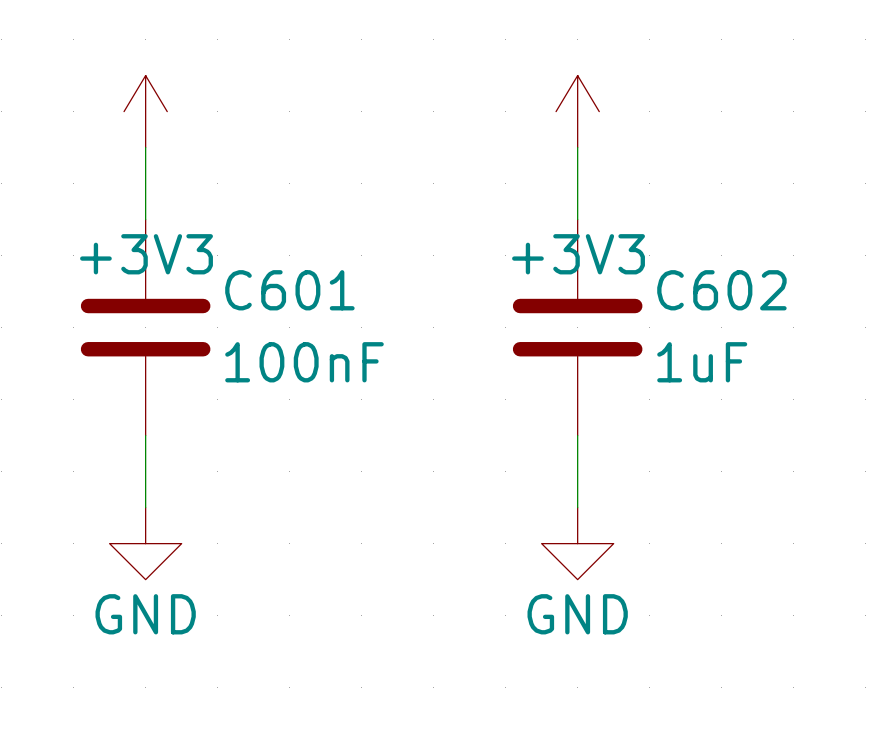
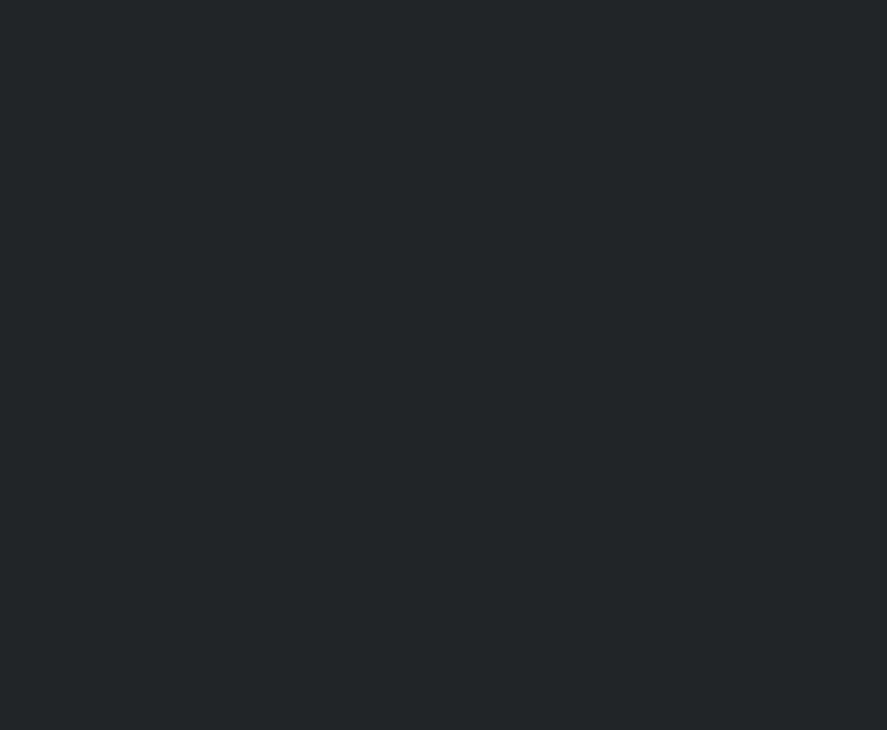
power symbol: +3V3 (145, 111) -> none
power symbol: +3V3 (577, 111) -> none
wire: (145, 147) (145, 219) -> none
wire: (577, 147) (577, 219) -> none
C601: 100nF (145, 327) -> none
C602: 1uF (577, 327) -> none
wire: (145, 435) (145, 507) -> none
wire: (577, 435) (577, 507) -> none
power symbol: GND (145, 543) -> none
power symbol: GND (577, 543) -> none

